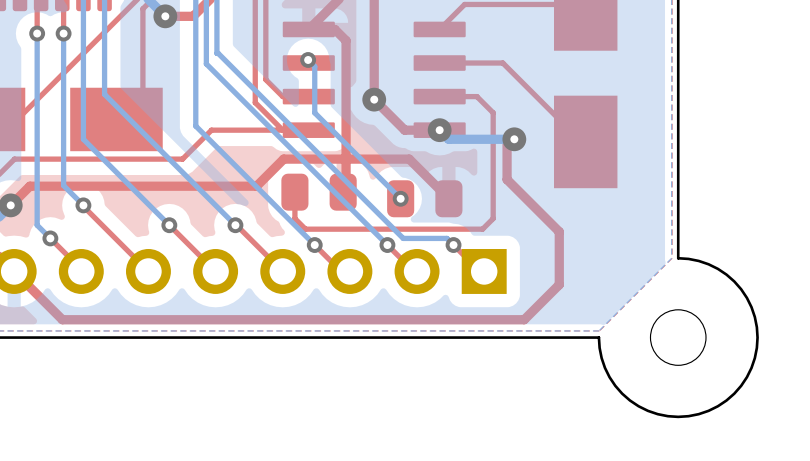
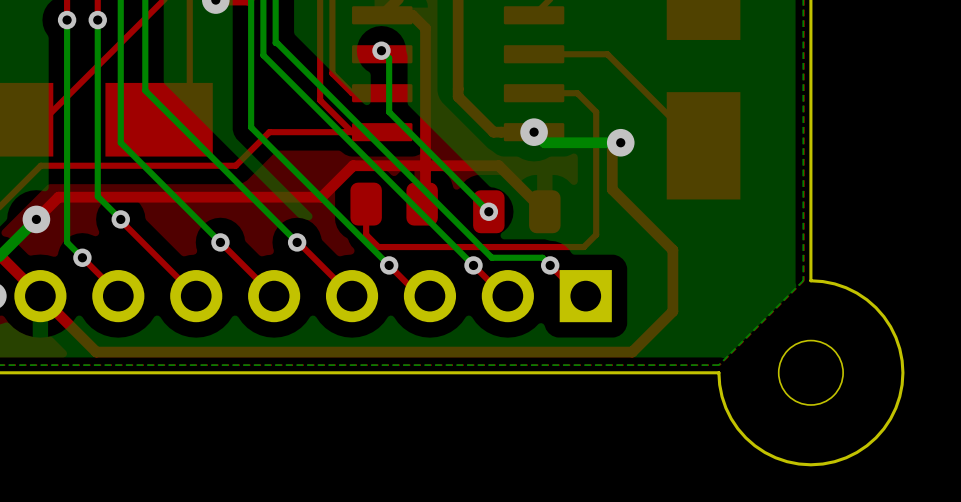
via: (374, 99) -> none

